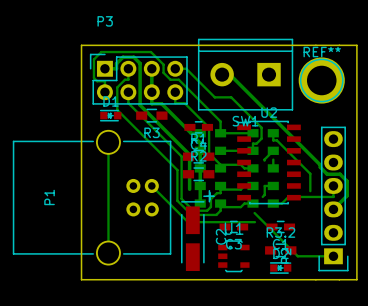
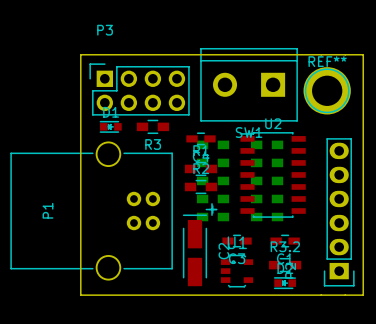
bottom track: (104, 68) (116, 68) (116, 63) (123, 57) (133, 57) (140, 63) (140, 105) (189, 154) (189, 189) -> none
bottom track: (128, 68) (128, 79) (124, 79) (117, 87) (117, 109) (177, 170) (177, 200) (191, 214) (216, 214) (220, 210) (220, 203) -> none
bottom track: (151, 68) (151, 103) (161, 103) (191, 133) (200, 133) -> none
bottom track: (175, 68) (186, 68) (214, 97) (231, 97) (261, 127) (261, 138) (256, 143) (253, 143) (253, 150) (220, 150) -> none
bottom track: (222, 74) (229, 74) (327, 174) (340, 174) (347, 181) (347, 195) (333, 209) -> none
bottom track: (104, 92) (104, 81) (97, 81) (93, 78) (93, 59) (101, 52) (150, 52) (163, 64) (163, 72) (170, 79) (178, 79) (220, 121) (220, 133) (253, 133) -> none
bottom track: (128, 92) (128, 103) (181, 156) (181, 198) (193, 210) (207, 210) (210, 206) (210, 199) (216, 193) (220, 193) (220, 185) -> none
bottom track: (175, 92) (175, 103) (184, 103) (209, 127) (209, 153) (220, 164) -> none
bottom track: (196, 133) (196, 139) (200, 143) (200, 203) -> none
bottom track: (273, 133) (273, 140) (276, 140) (310, 173) (310, 191) -> none
bottom track: (108, 142) (108, 253) -> none
bottom track: (273, 150) (264, 160) -> none
bottom track: (273, 159) (273, 168) -> none
bottom track: (220, 164) (240, 164) (244, 168) (253, 168) -> none
bottom track: (151, 185) (188, 222) (254, 222) -> none
bottom track: (253, 185) (244, 185) (240, 189) (220, 189) -> none
bottom track: (273, 185) (264, 185) (264, 194) (262, 196) -> none
bottom track: (333, 185) (333, 196) (288, 196) (281, 203) (273, 203) -> none
bottom track: (253, 203) (244, 203) (240, 207) (220, 207) -> none
bottom track: (254, 213) (297, 256) (333, 256) -> none

